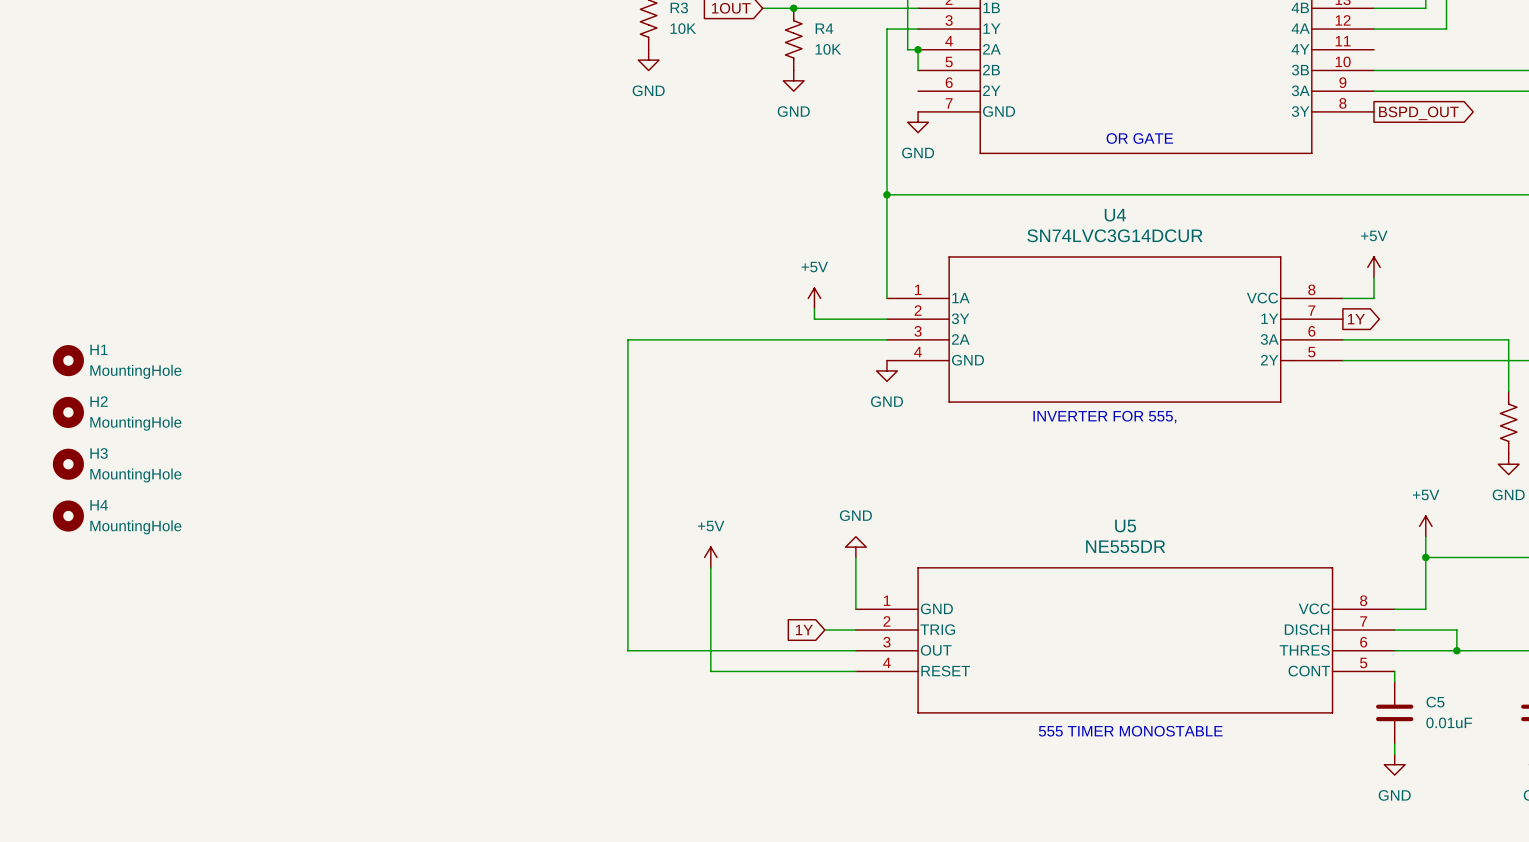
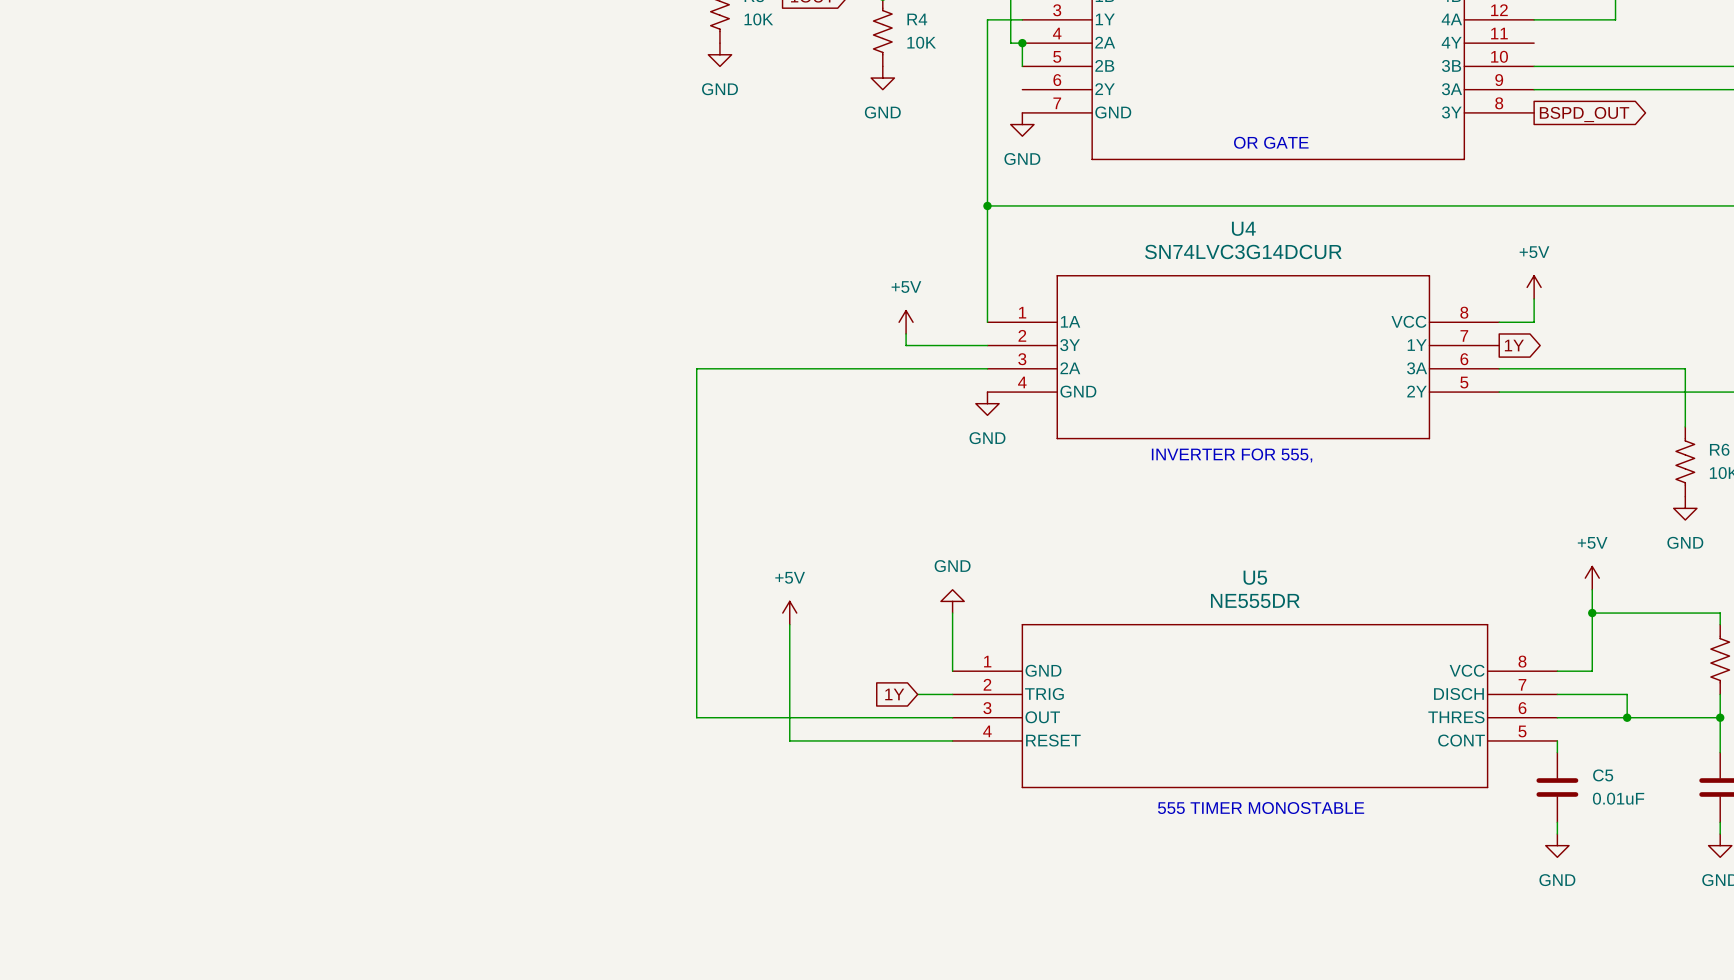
H1: MountingHole (68, 360) -> none
H2: MountingHole (68, 412) -> none
H3: MountingHole (68, 464) -> none
H4: MountingHole (68, 516) -> none

